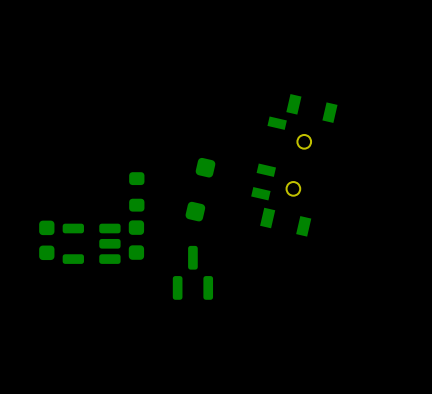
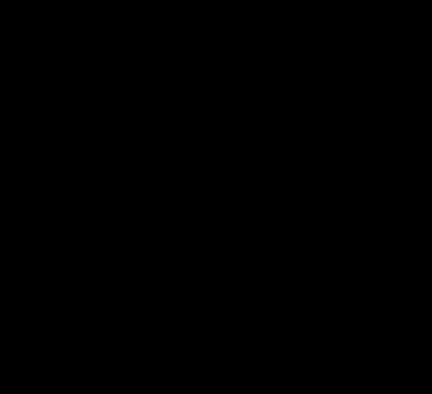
part: (294, 165) -> none
part: (200, 189) -> none
part: (136, 191) -> none
part: (46, 240) -> none
part: (136, 240) -> none
part: (91, 243) -> none
part: (192, 272) -> none

